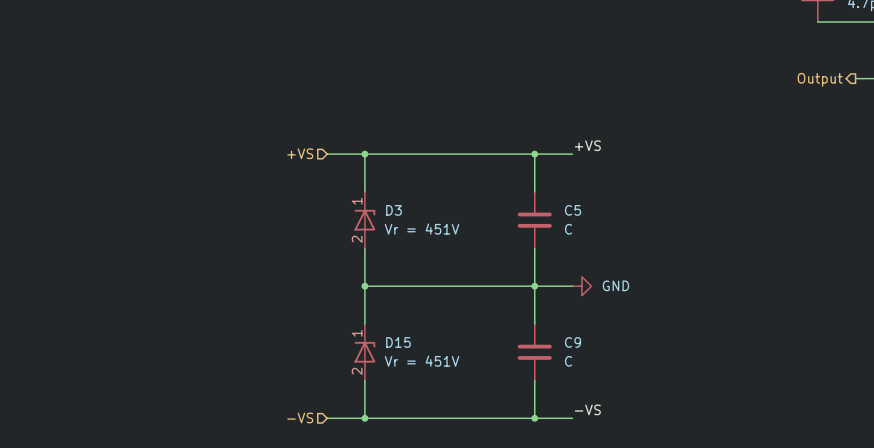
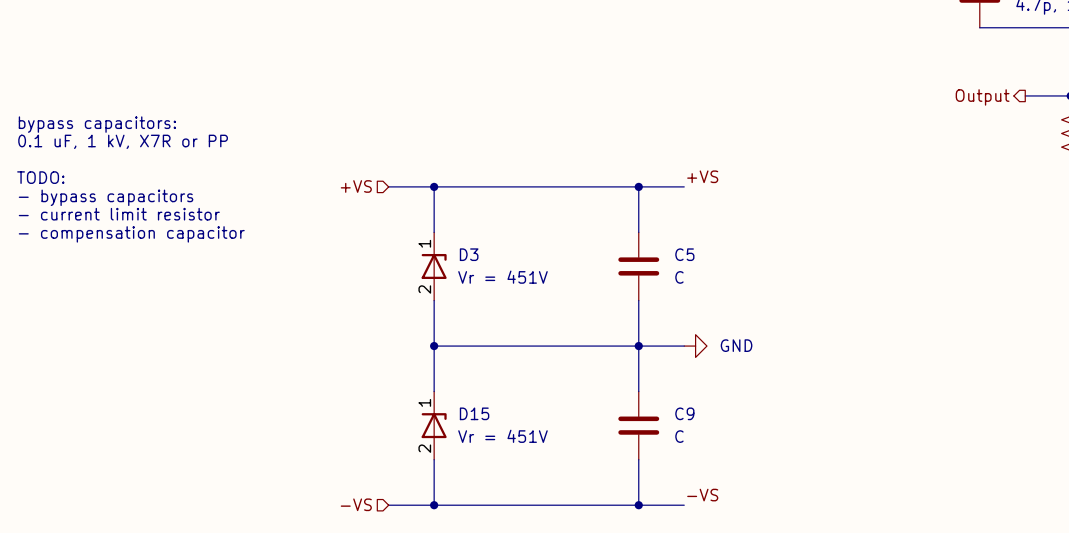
text: none -> bypass capacitors: (97, 124)
text: none -> 0.1 uF, 1 kV, X7R or PP (123, 141)
text: none -> TODO: (40, 177)
text: none -> - bypass capacitors (106, 197)
text: none -> - current limit resistor (119, 214)
text: none -> - compensation capacitor (131, 234)

